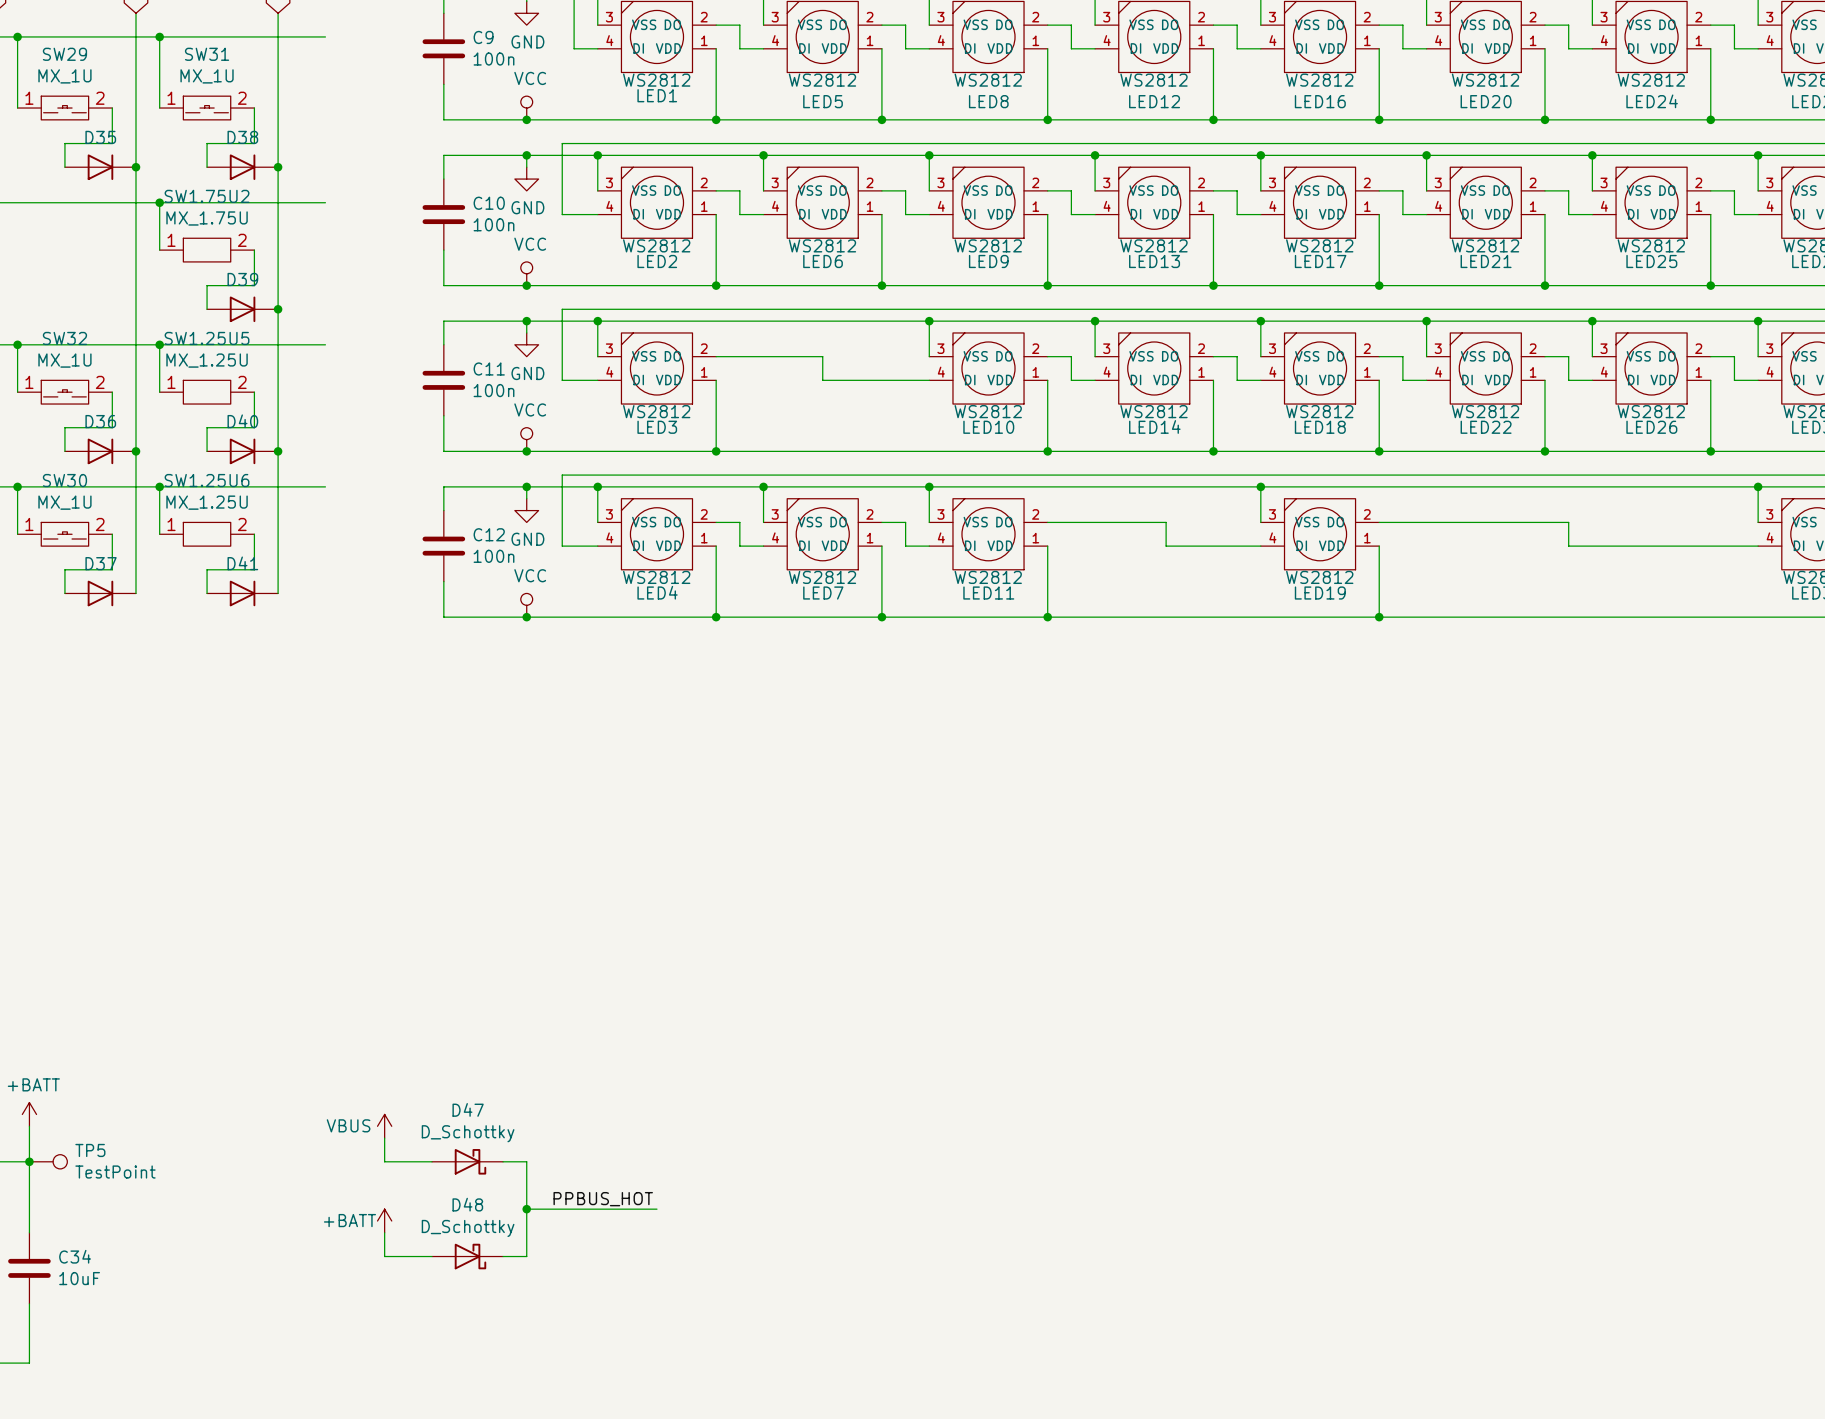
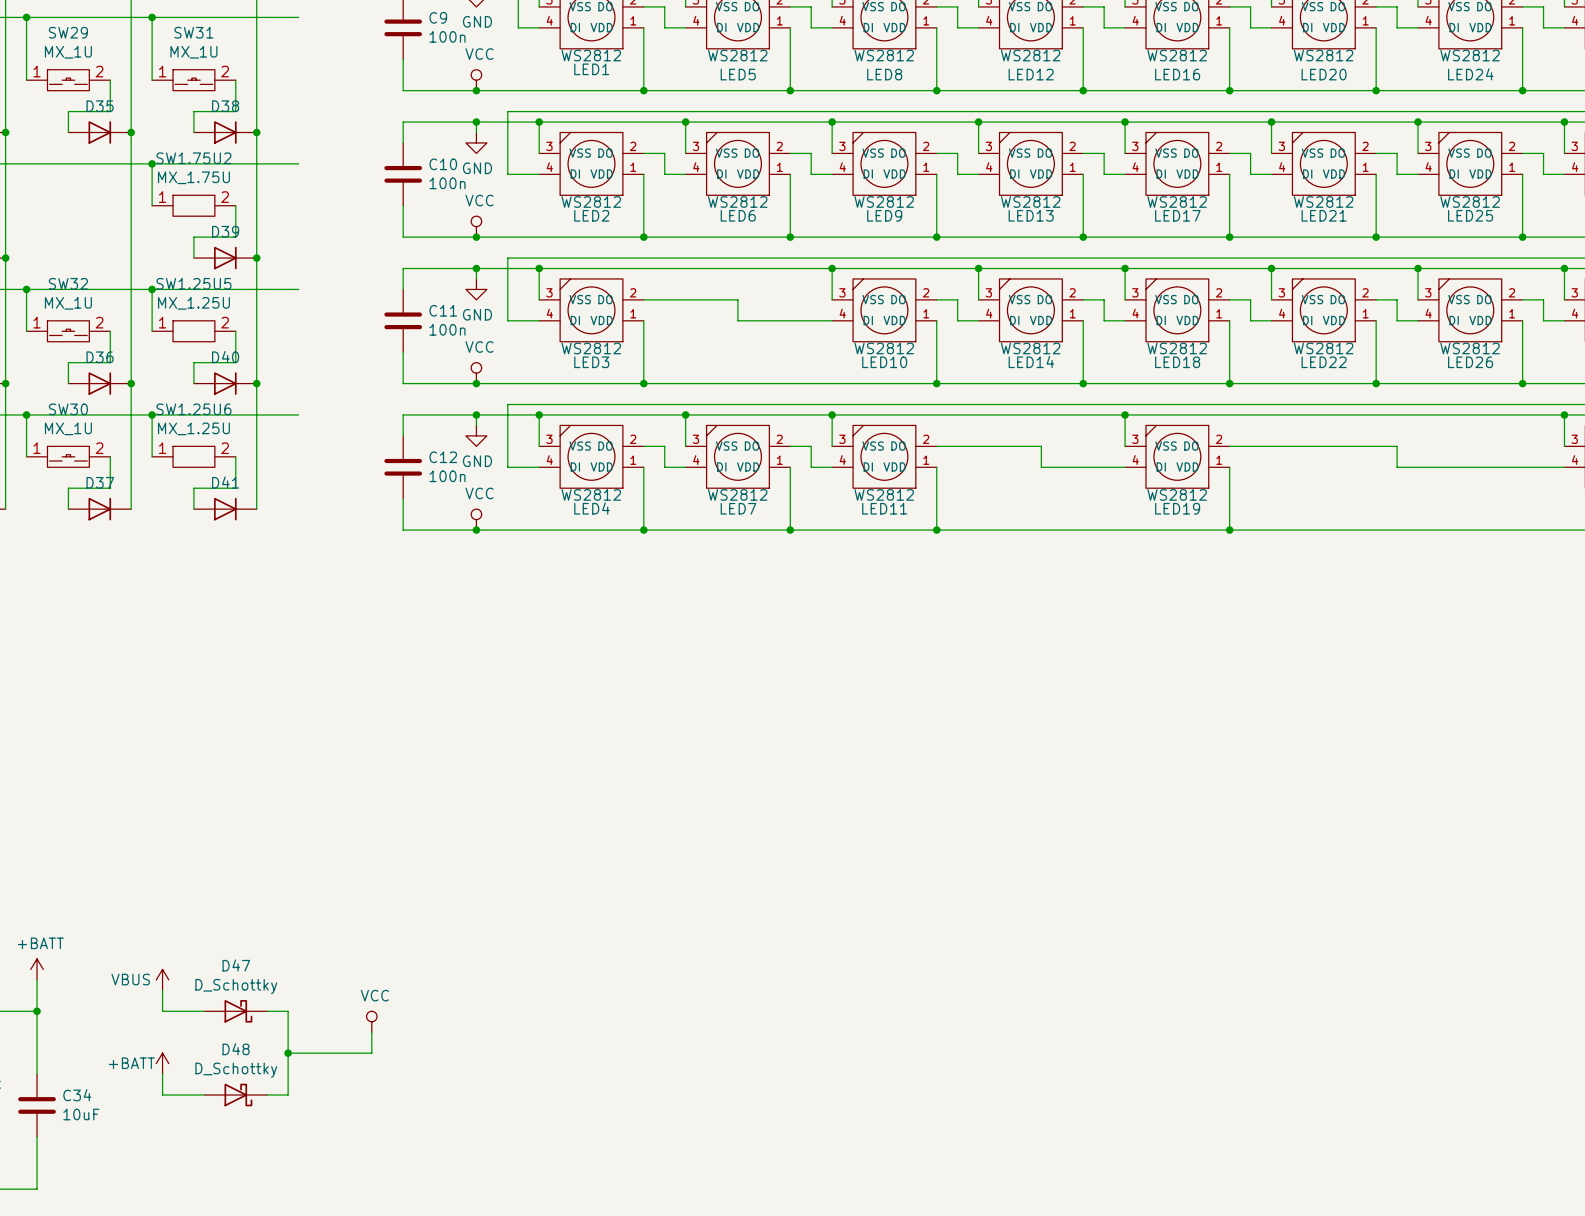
power symbol position: VBUS (384, 1126) -> VBUS (162, 979)
wire: (384, 1138) (384, 1161) (432, 1161) -> (162, 990) (162, 1011) (204, 1011)
TP5: TestPoint (48, 1161) -> none
D47 position: (467, 1161) -> (235, 1011)
wire: (503, 1161) (526, 1161) (526, 1256) (503, 1256) -> (267, 1011) (288, 1011) (288, 1095) (267, 1095)
power symbol: none -> VCC (371, 1021)
wire: none -> (371, 1032) (371, 1053) (288, 1053)
label: PPBUS_HOT (603, 1199) -> none
junction: none -> (288, 1053)
wire: (526, 1209) (656, 1209) -> none
junction: (526, 1209) -> none
power symbol position: +BATT (384, 1221) -> +BATT (162, 1063)
wire: (384, 1232) (384, 1256) (432, 1256) -> (162, 1074) (162, 1095) (204, 1095)
D48 position: (467, 1256) -> (235, 1095)

